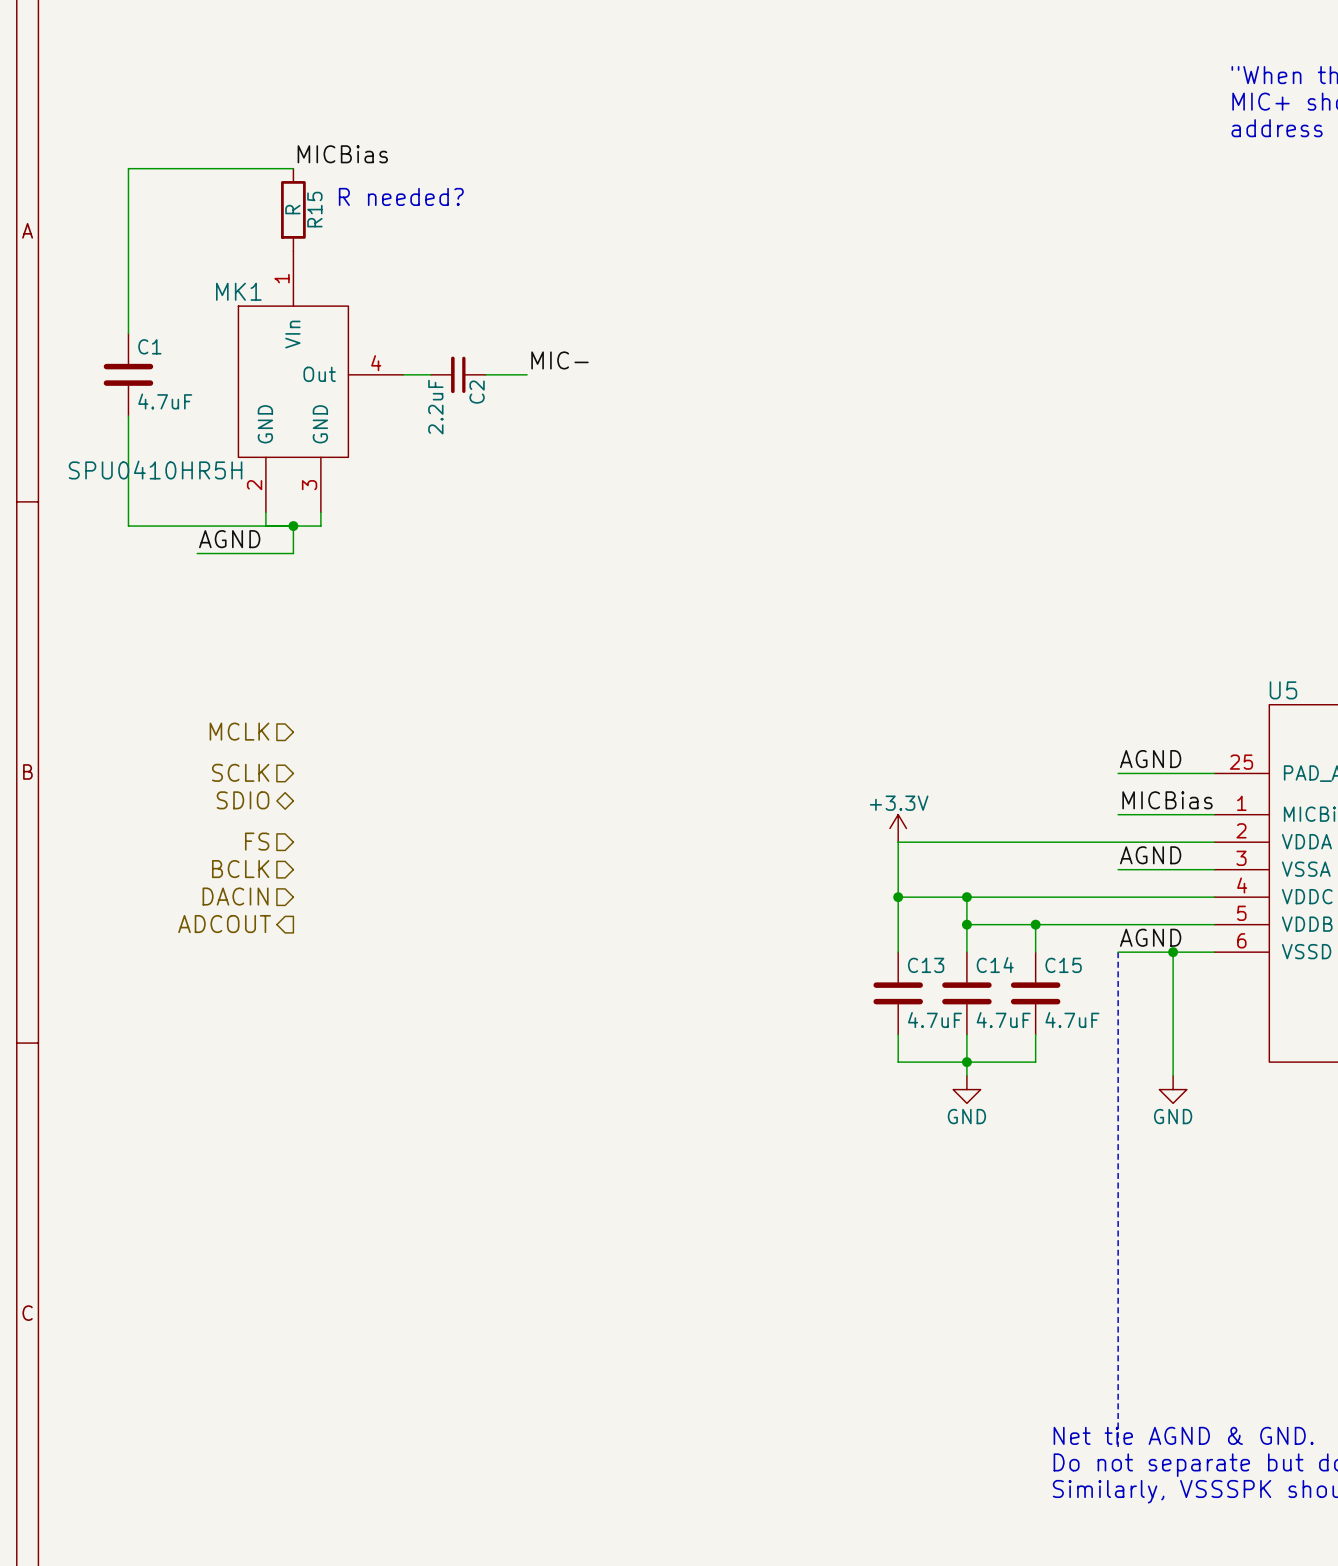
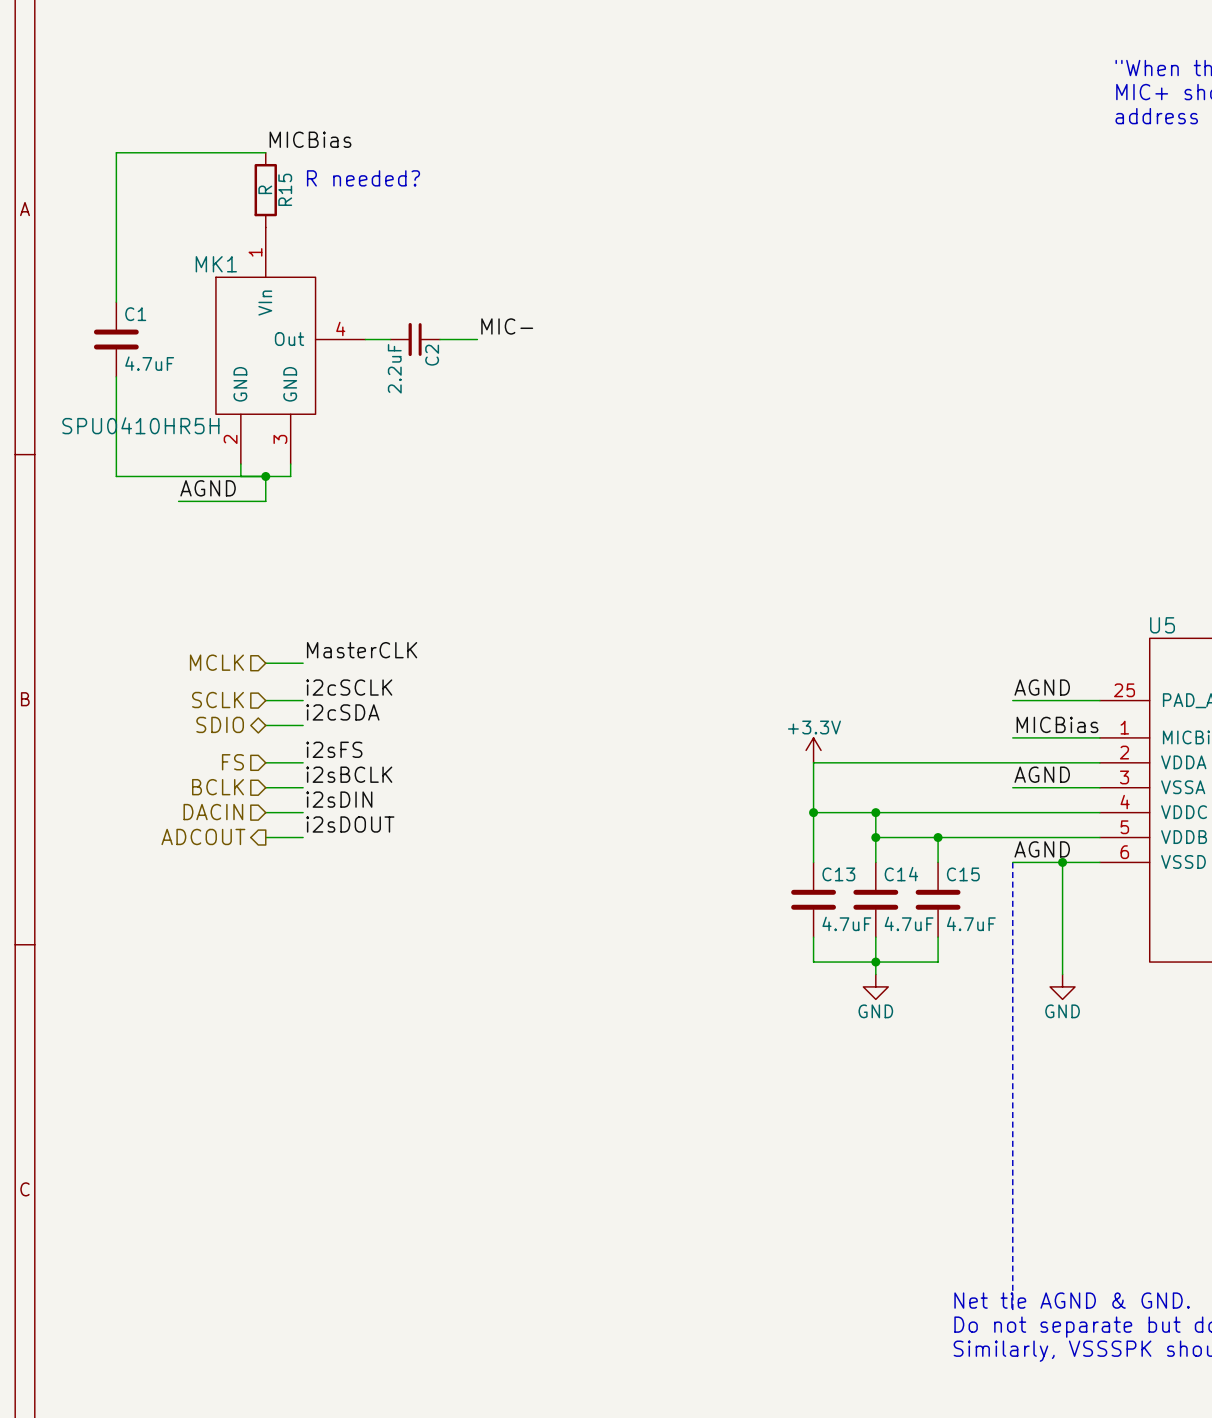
label: none -> MasterCLK (362, 650)
wire: none -> (265, 663) (303, 663)
label: none -> i2cSCLK (349, 687)
wire: none -> (265, 700) (303, 700)
label: none -> i2cSDA (342, 712)
wire: none -> (265, 725) (303, 725)
label: none -> i2sFS (334, 749)
wire: none -> (265, 762) (303, 762)
label: none -> i2sBCLK (349, 774)
wire: none -> (265, 787) (303, 787)
label: none -> i2sDIN (339, 799)
wire: none -> (265, 812) (303, 812)
label: none -> i2sDOUT (350, 824)
wire: none -> (265, 837) (303, 837)

